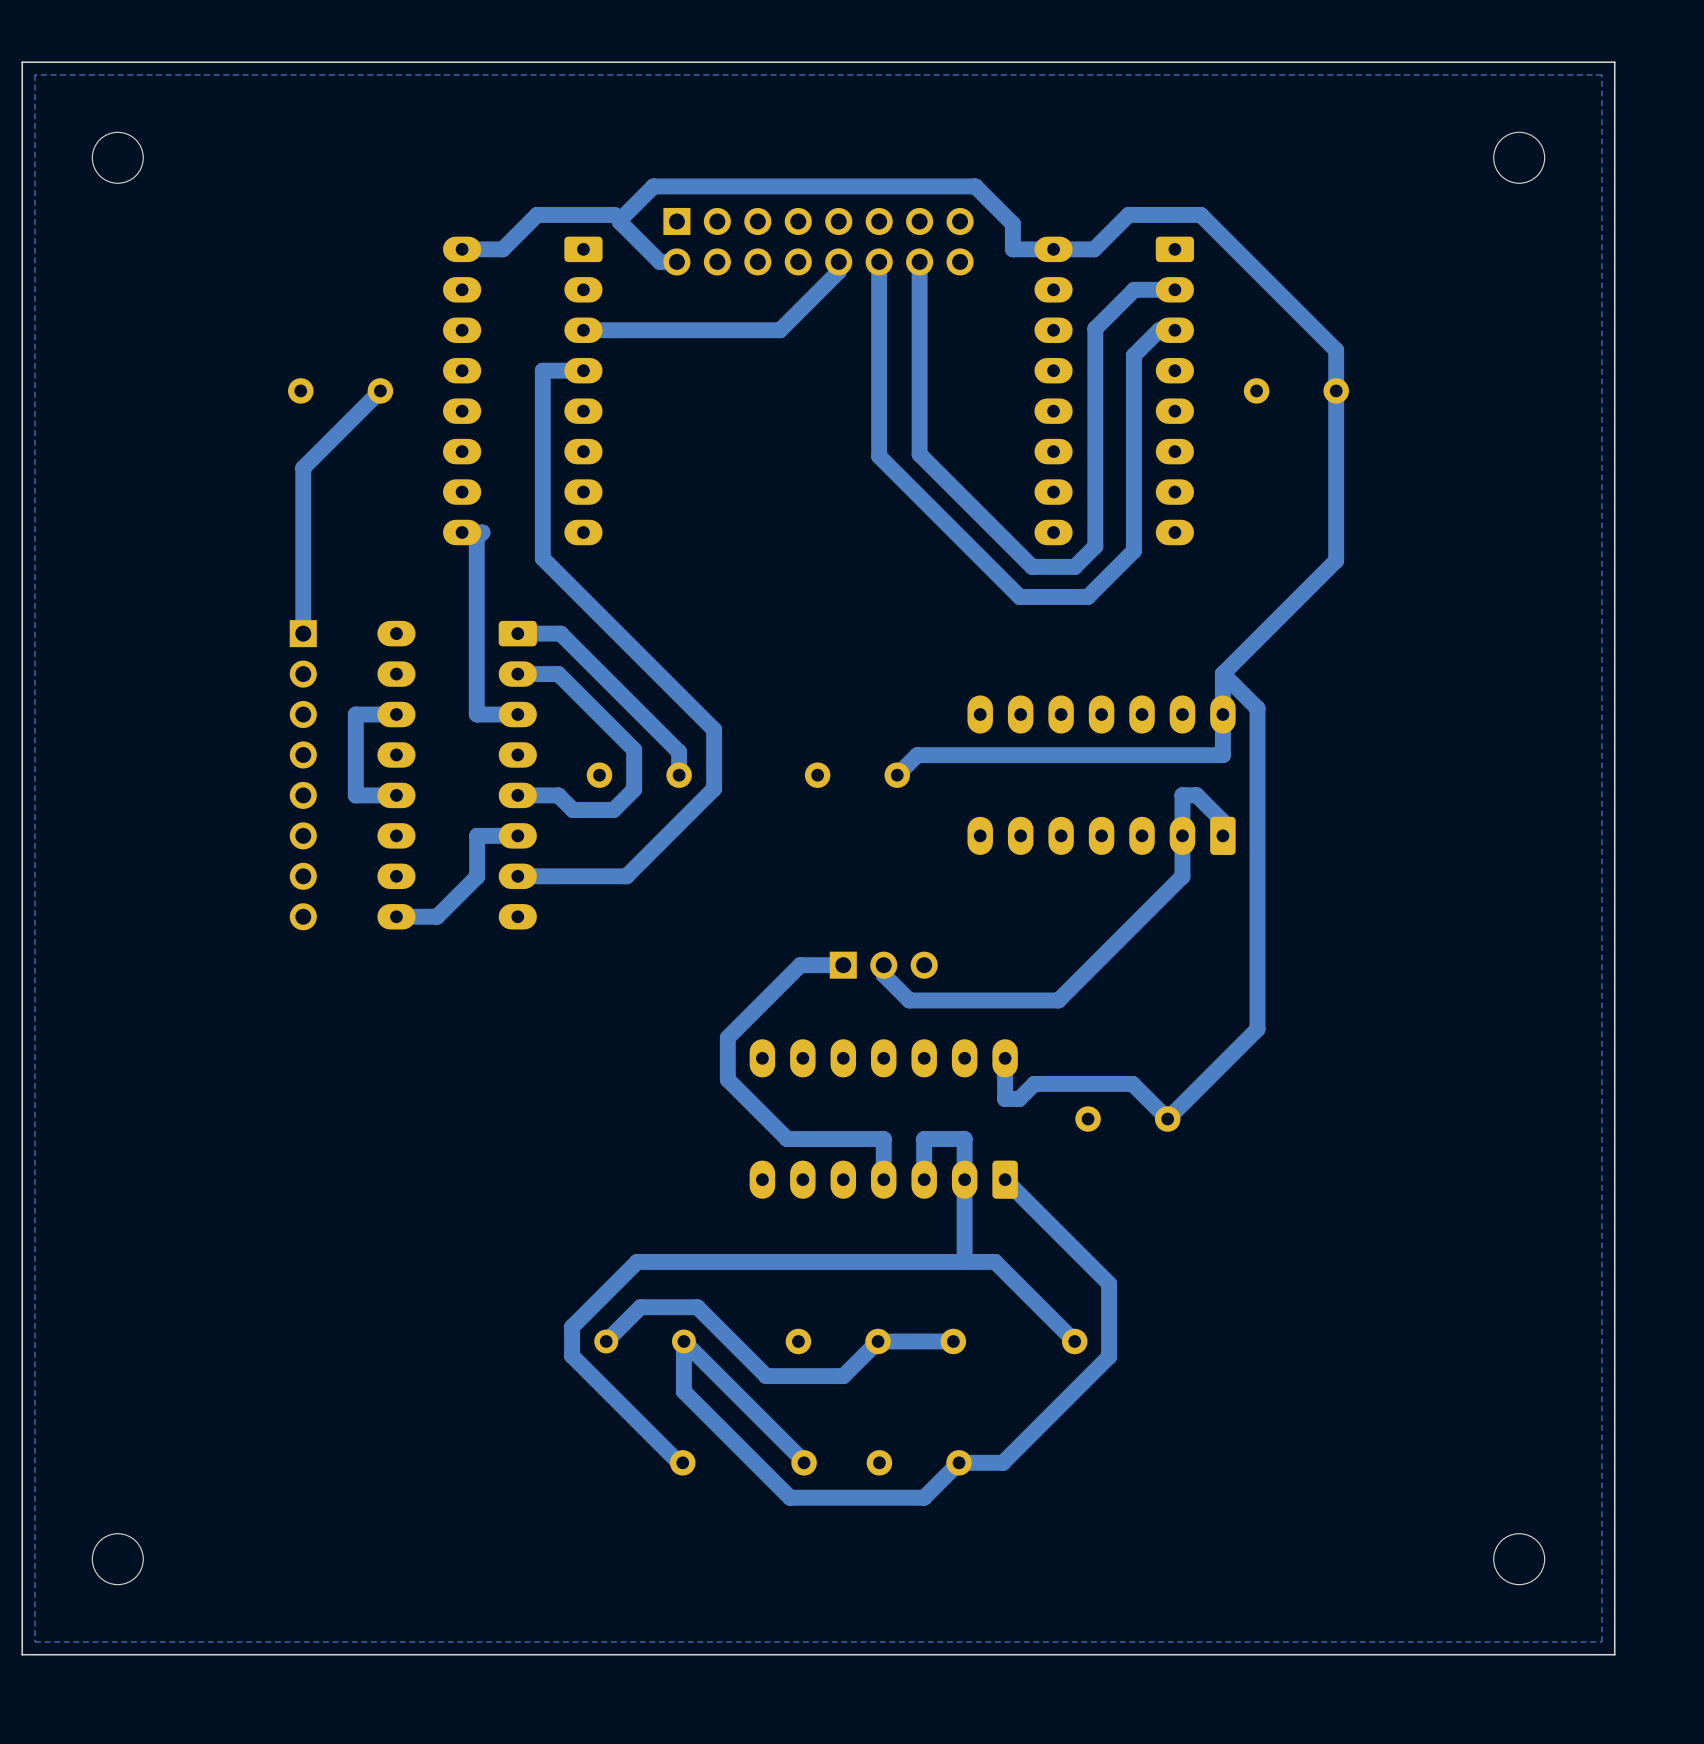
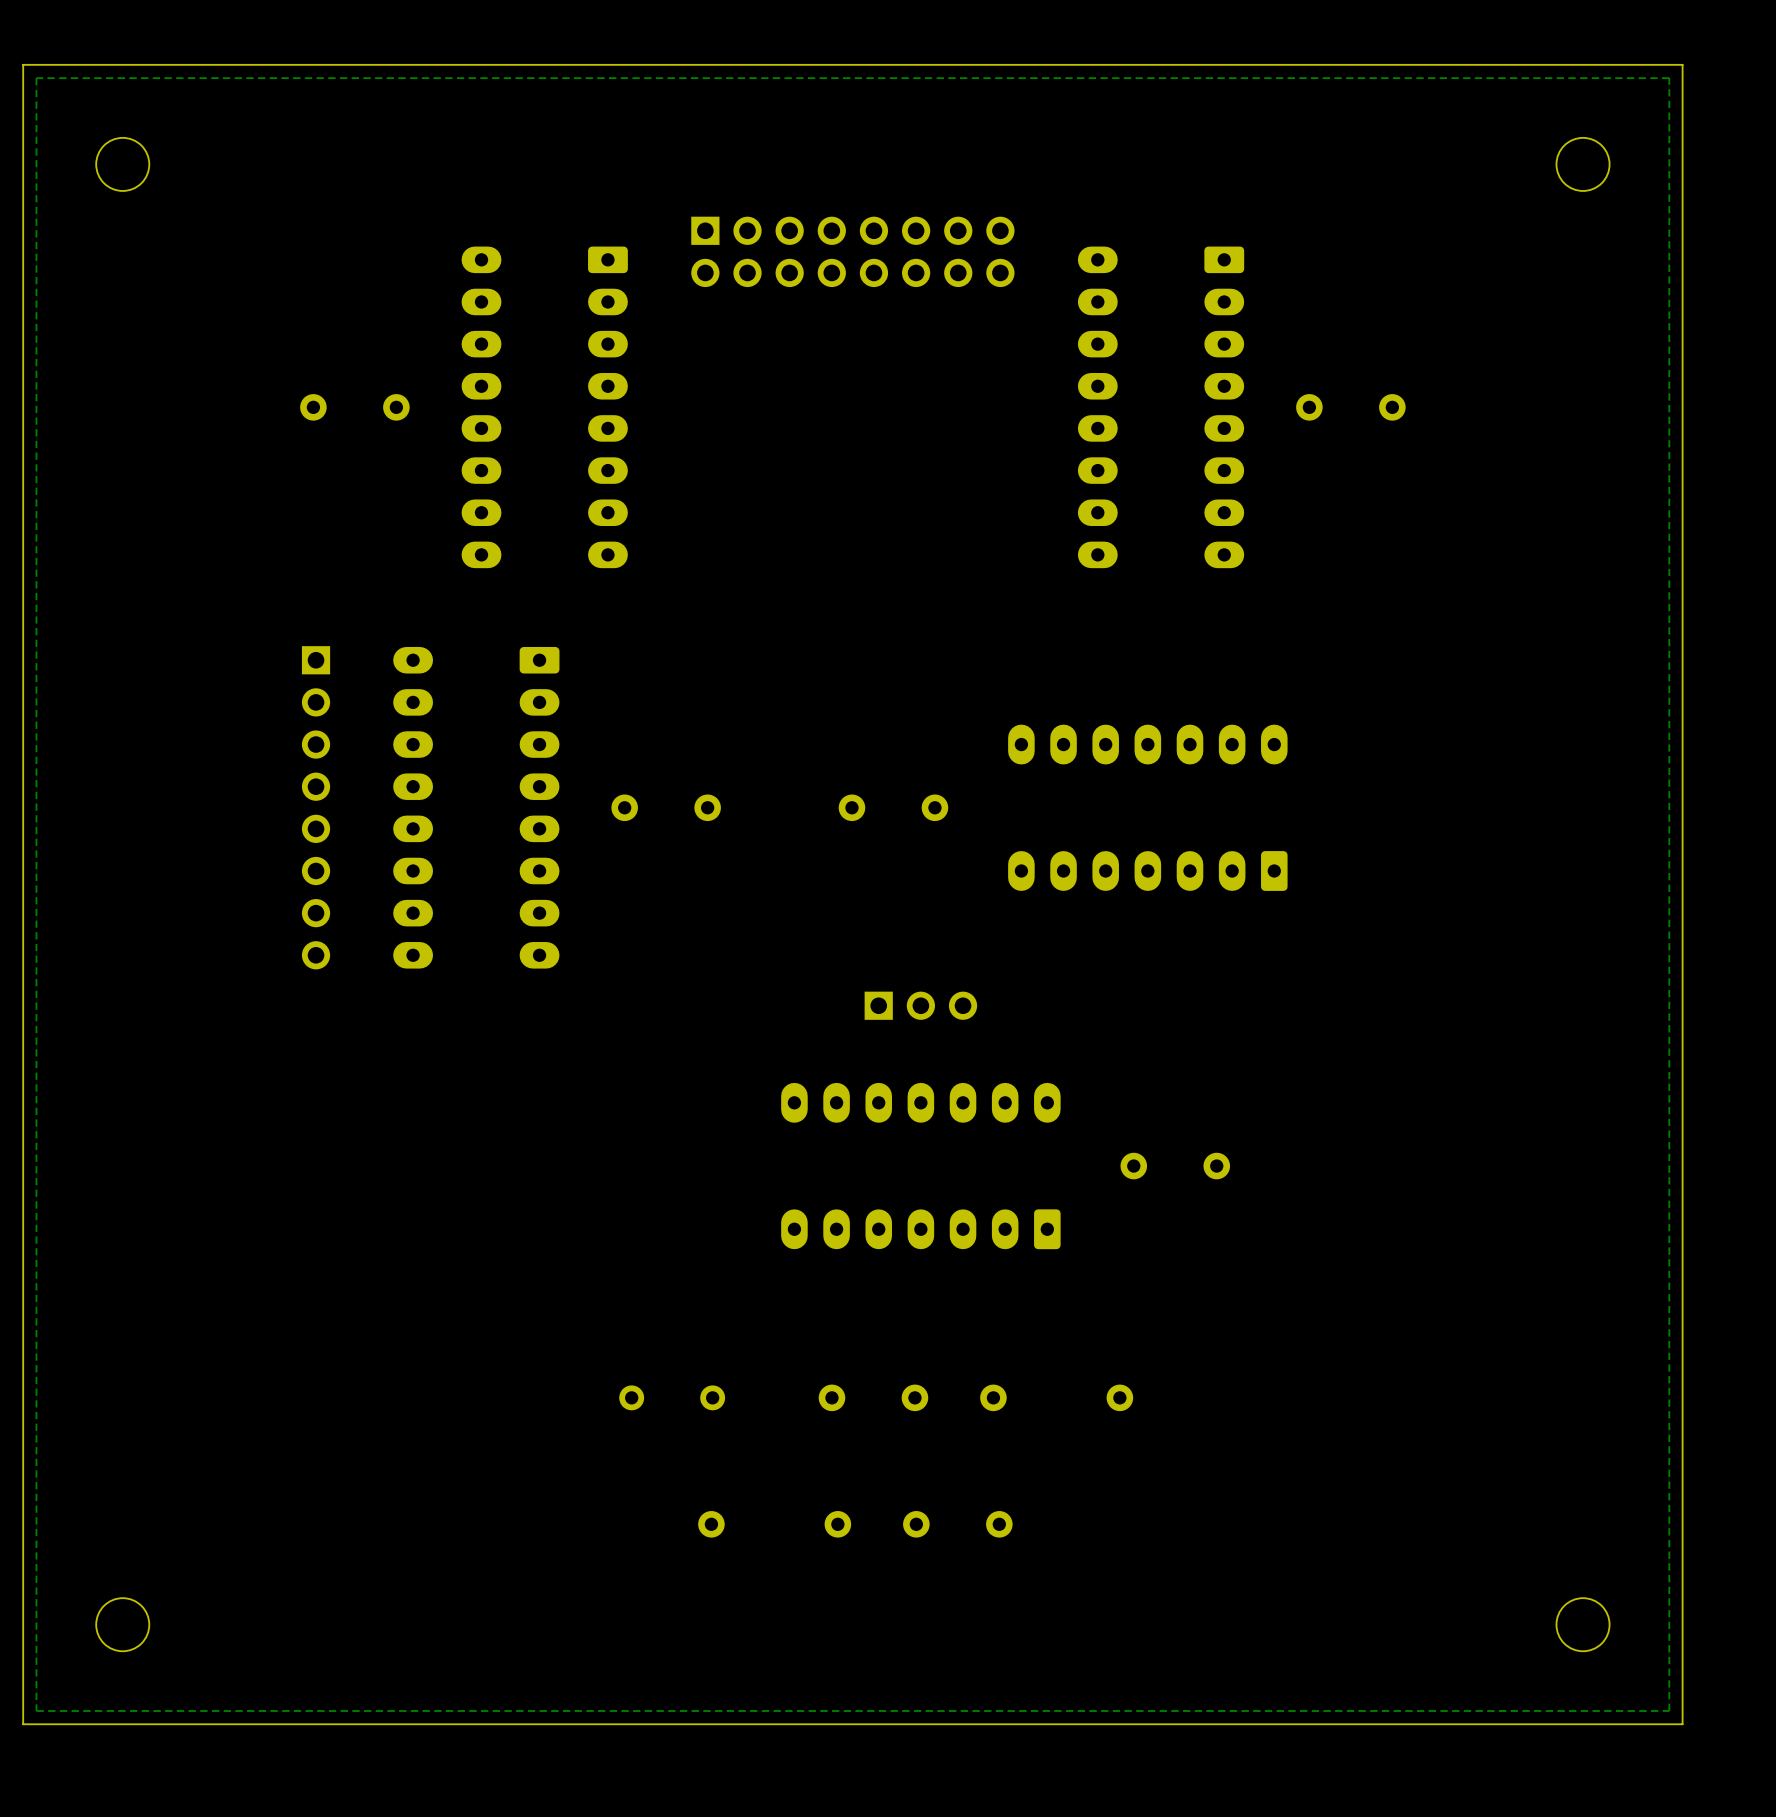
track: (619, 220) (659, 261) (676, 261) -> none
track: (619, 220) (653, 186) (975, 186) (1012, 223) (1012, 249) (1094, 249) (1128, 214) (1200, 214) (1336, 350) (1336, 560) (1222, 673) -> none
track: (619, 220) (614, 214) (537, 214) (502, 249) (462, 249) -> none
track: (838, 261) (838, 271) (780, 330) (583, 330) -> none
track: (879, 261) (879, 456) (1019, 596) (1087, 596) (1133, 550) (1133, 355) (1159, 330) (1174, 330) -> none
track: (919, 261) (919, 454) (1032, 566) (1074, 566) (1095, 546) (1095, 328) (1134, 289) (1174, 289) -> none
track: (583, 370) (542, 370) (542, 558) (714, 729) (714, 788) (626, 876) (517, 876) -> none
track: (380, 390) (303, 468) (303, 633) -> none
track: (462, 532) (482, 532) (476, 538) (476, 714) (517, 714) -> none
track: (517, 633) (560, 633) (679, 752) (679, 775) -> none
track: (1222, 673) (1222, 755) (917, 755) (897, 775) -> none
track: (1222, 673) (1257, 708) (1257, 1029) (1167, 1119) (1132, 1083) (1034, 1083) (1019, 1098) (1005, 1098) (1005, 1058) -> none
track: (517, 674) (558, 674) (634, 749) (634, 789) (613, 810) (573, 810) (558, 795) (517, 795) -> none
track: (396, 714) (355, 714) (355, 795) (396, 795) -> none
track: (517, 835) (477, 835) (477, 876) (437, 916) (396, 916) -> none
track: (1222, 835) (1222, 821) (1196, 795) (1182, 795) (1182, 876) (1058, 1000) (909, 1000) (883, 974) (883, 965) -> none
track: (843, 965) (800, 965) (727, 1037) (727, 1079) (787, 1139) (883, 1139) (883, 1179) -> none
track: (924, 1179) (924, 1139) (964, 1139) (964, 1261) -> none
track: (1005, 1179) (1109, 1283) (1109, 1356) (1002, 1462) (959, 1462) (924, 1497) (790, 1497) (683, 1391) (683, 1341) (804, 1462) -> none
track: (953, 1341) (878, 1341) (843, 1376) (766, 1376) (697, 1307) (640, 1307) (606, 1341) -> none
track: (1074, 1341) (995, 1261) (637, 1261) (572, 1327) (572, 1355) (679, 1462) (682, 1462) -> none

